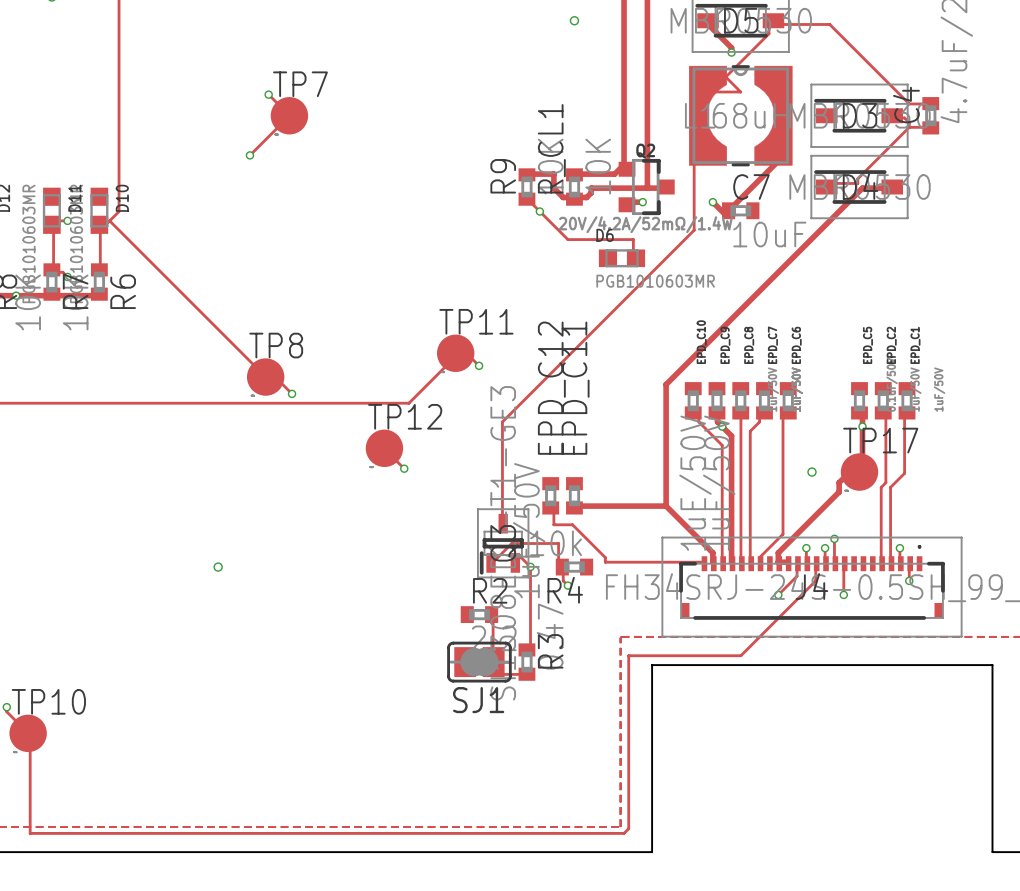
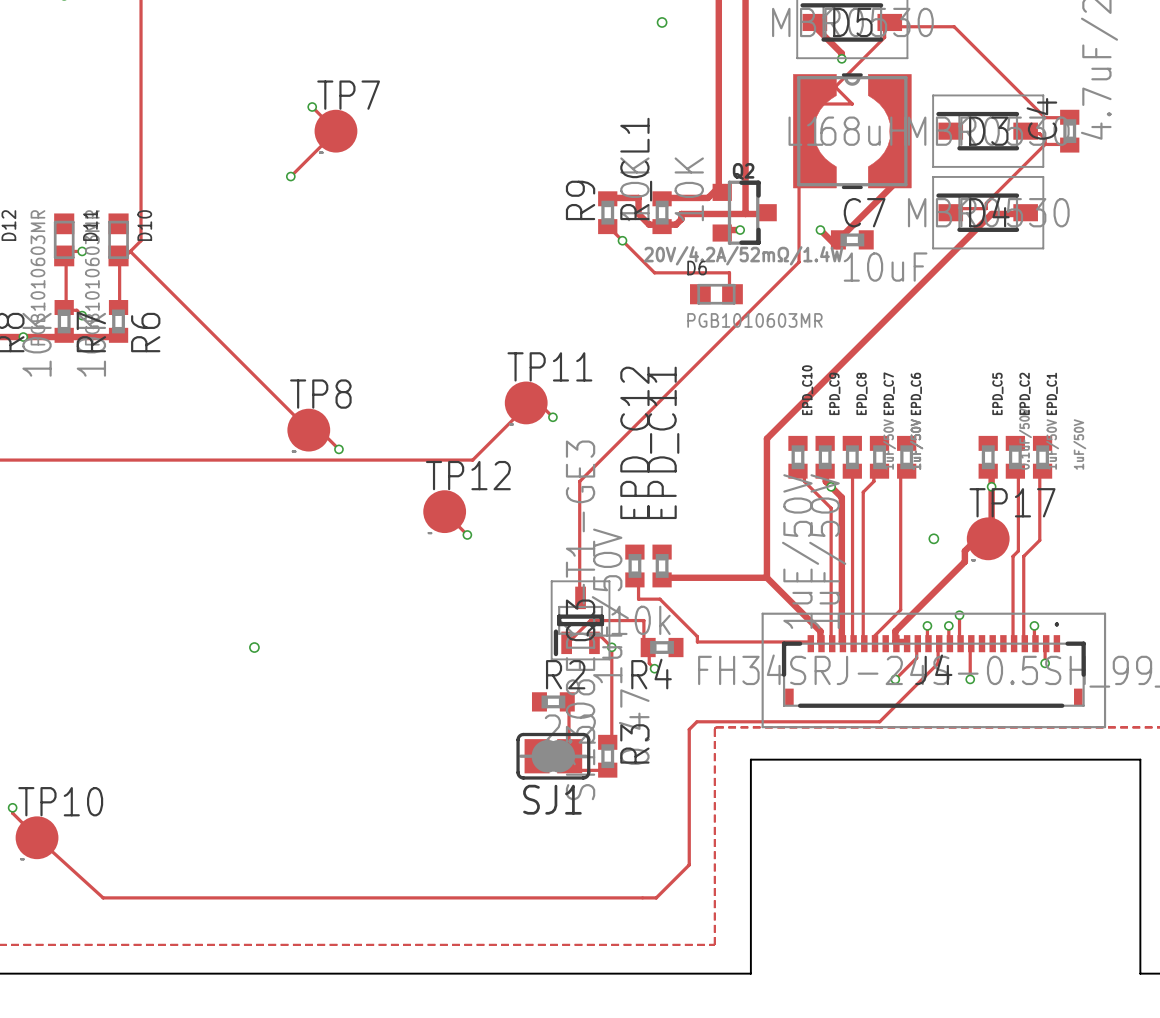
track: (764, 631) (740, 655) (628, 655) (628, 828) (624, 833) (30, 833) (30, 735) -> (879, 721) (696, 721) (689, 729) (689, 864) (656, 897) (103, 897) (39, 839)

